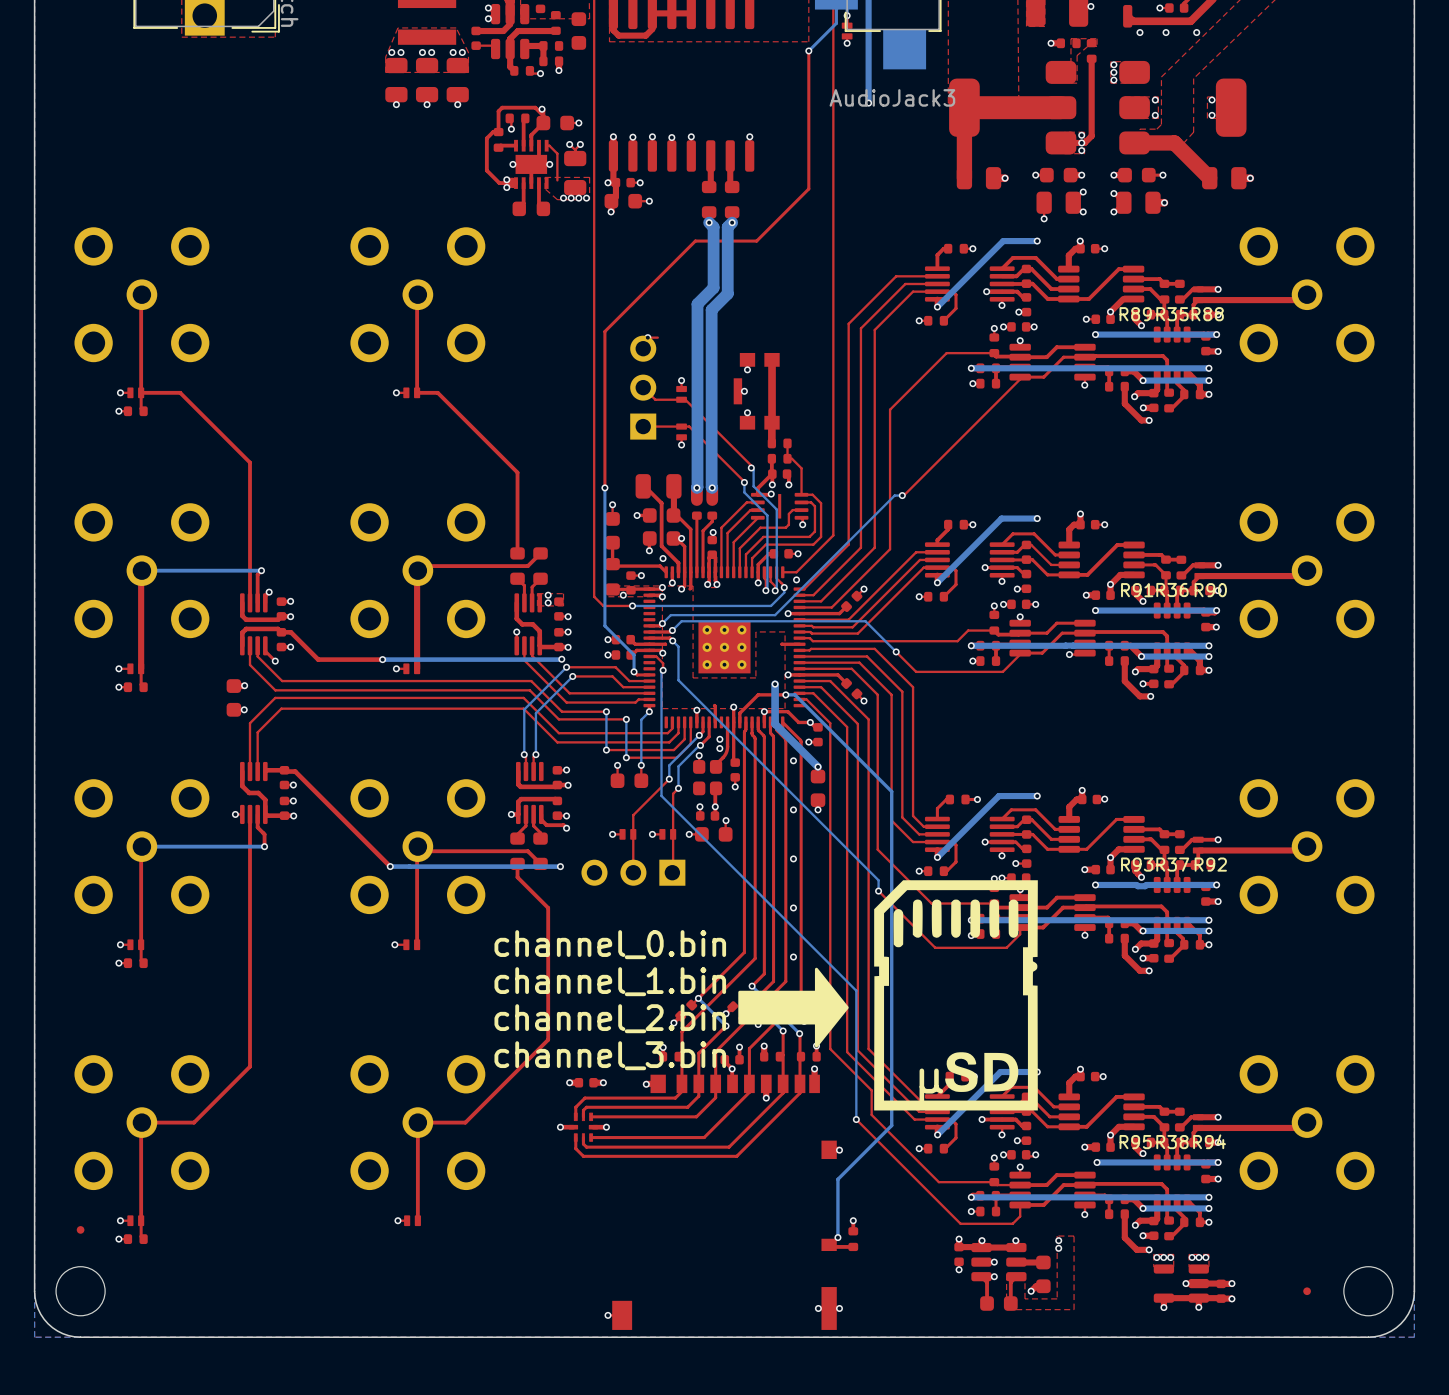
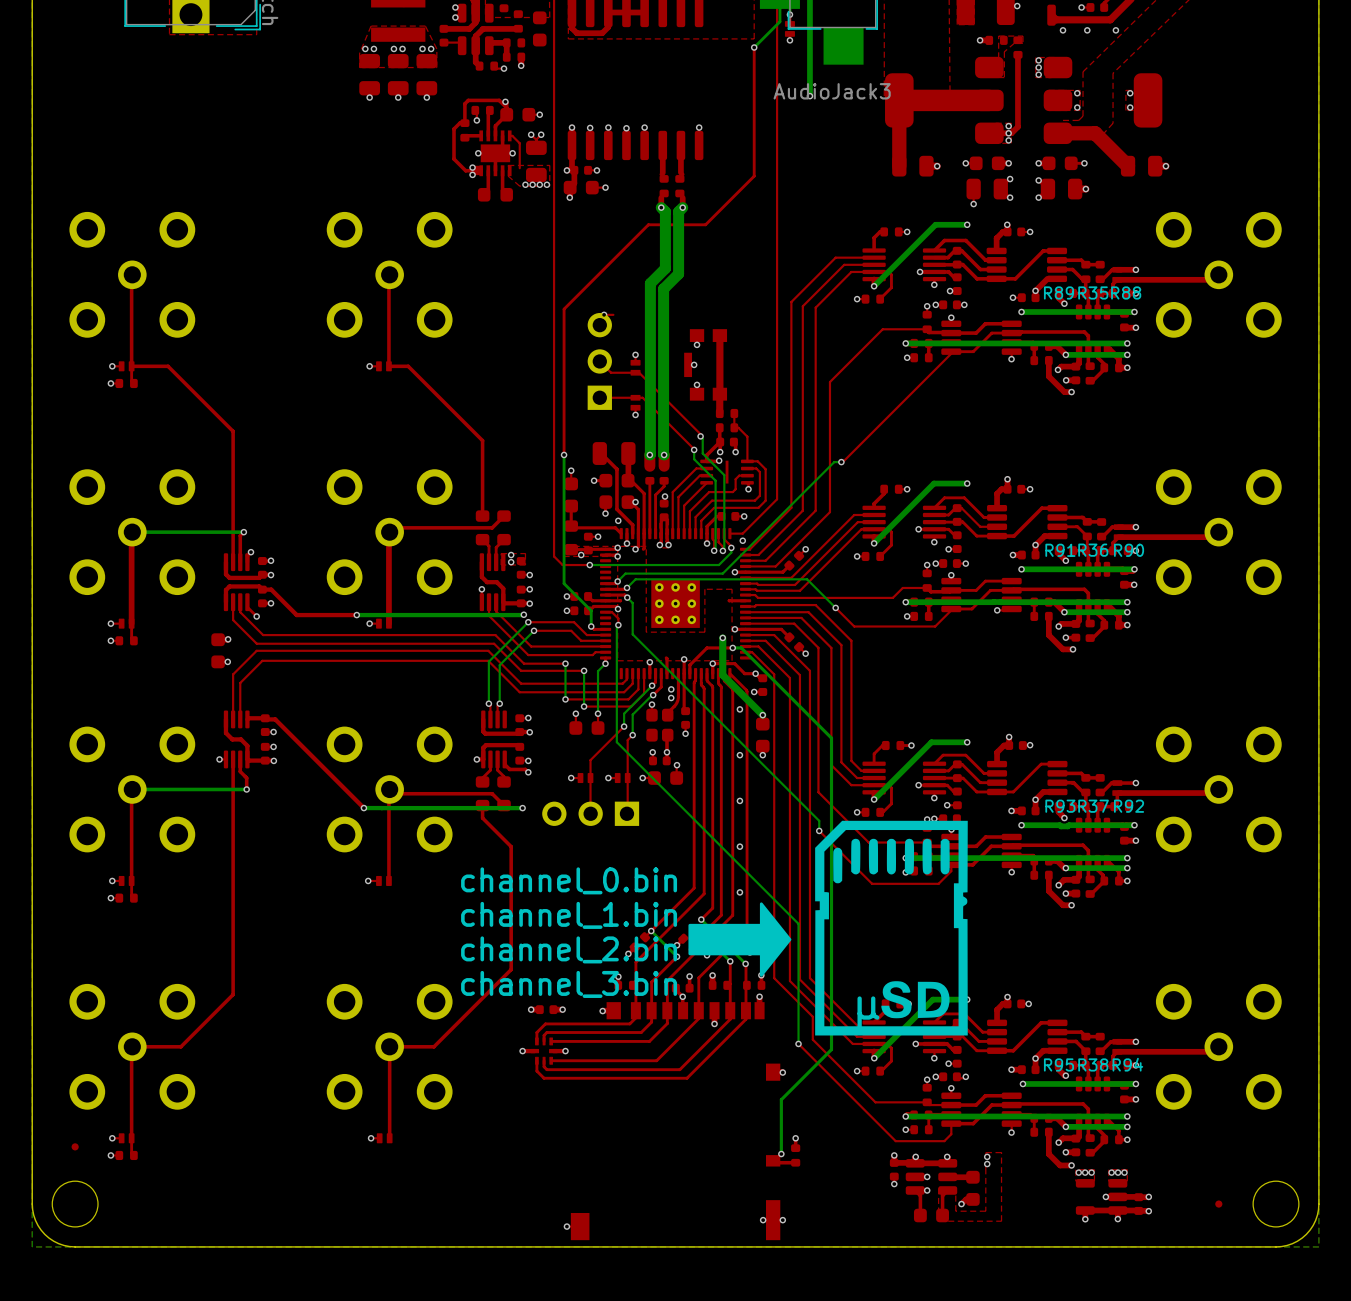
part footprint: [701, 180, 717, 219] -> [659, 175, 669, 198]
part footprint: [724, 180, 740, 219] -> [675, 175, 685, 198]

